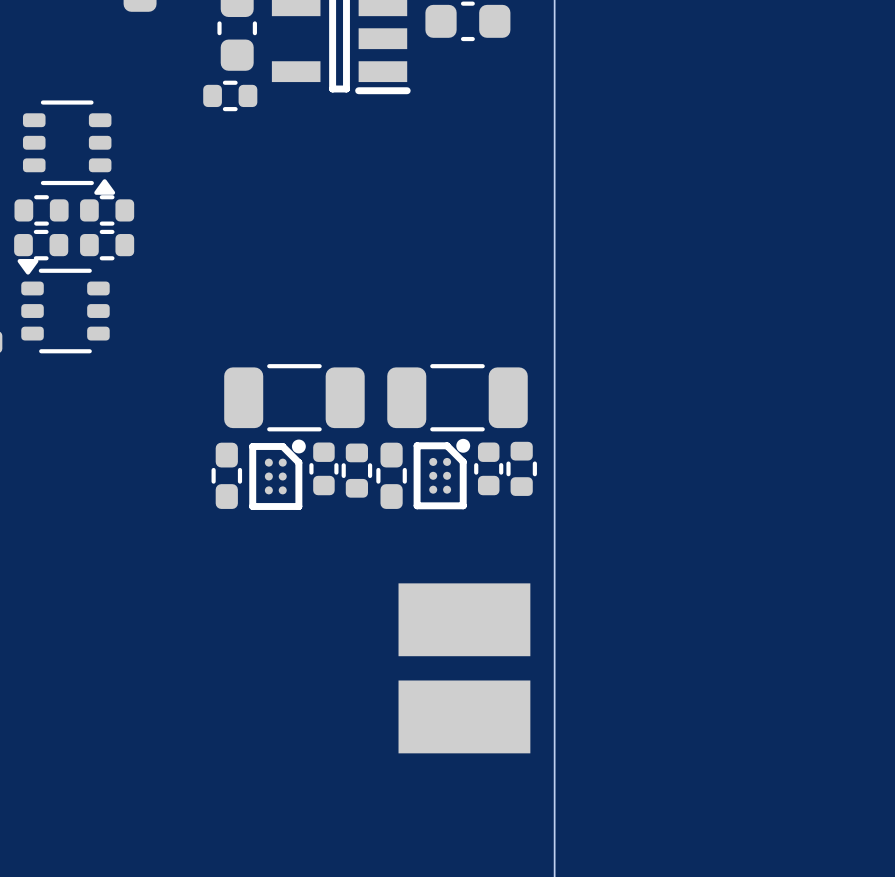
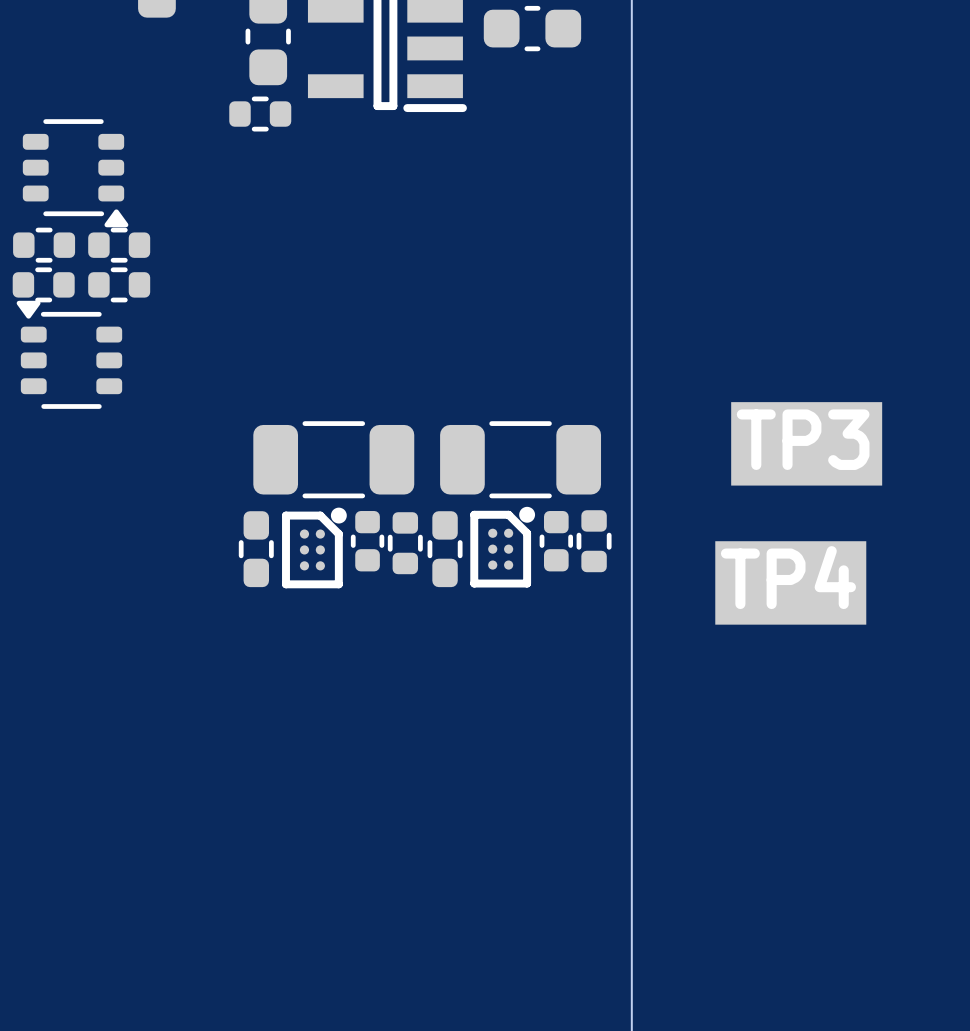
part: none -> (806, 443)
part: none -> (790, 582)
part: (464, 619) -> none
part: (464, 716) -> none

